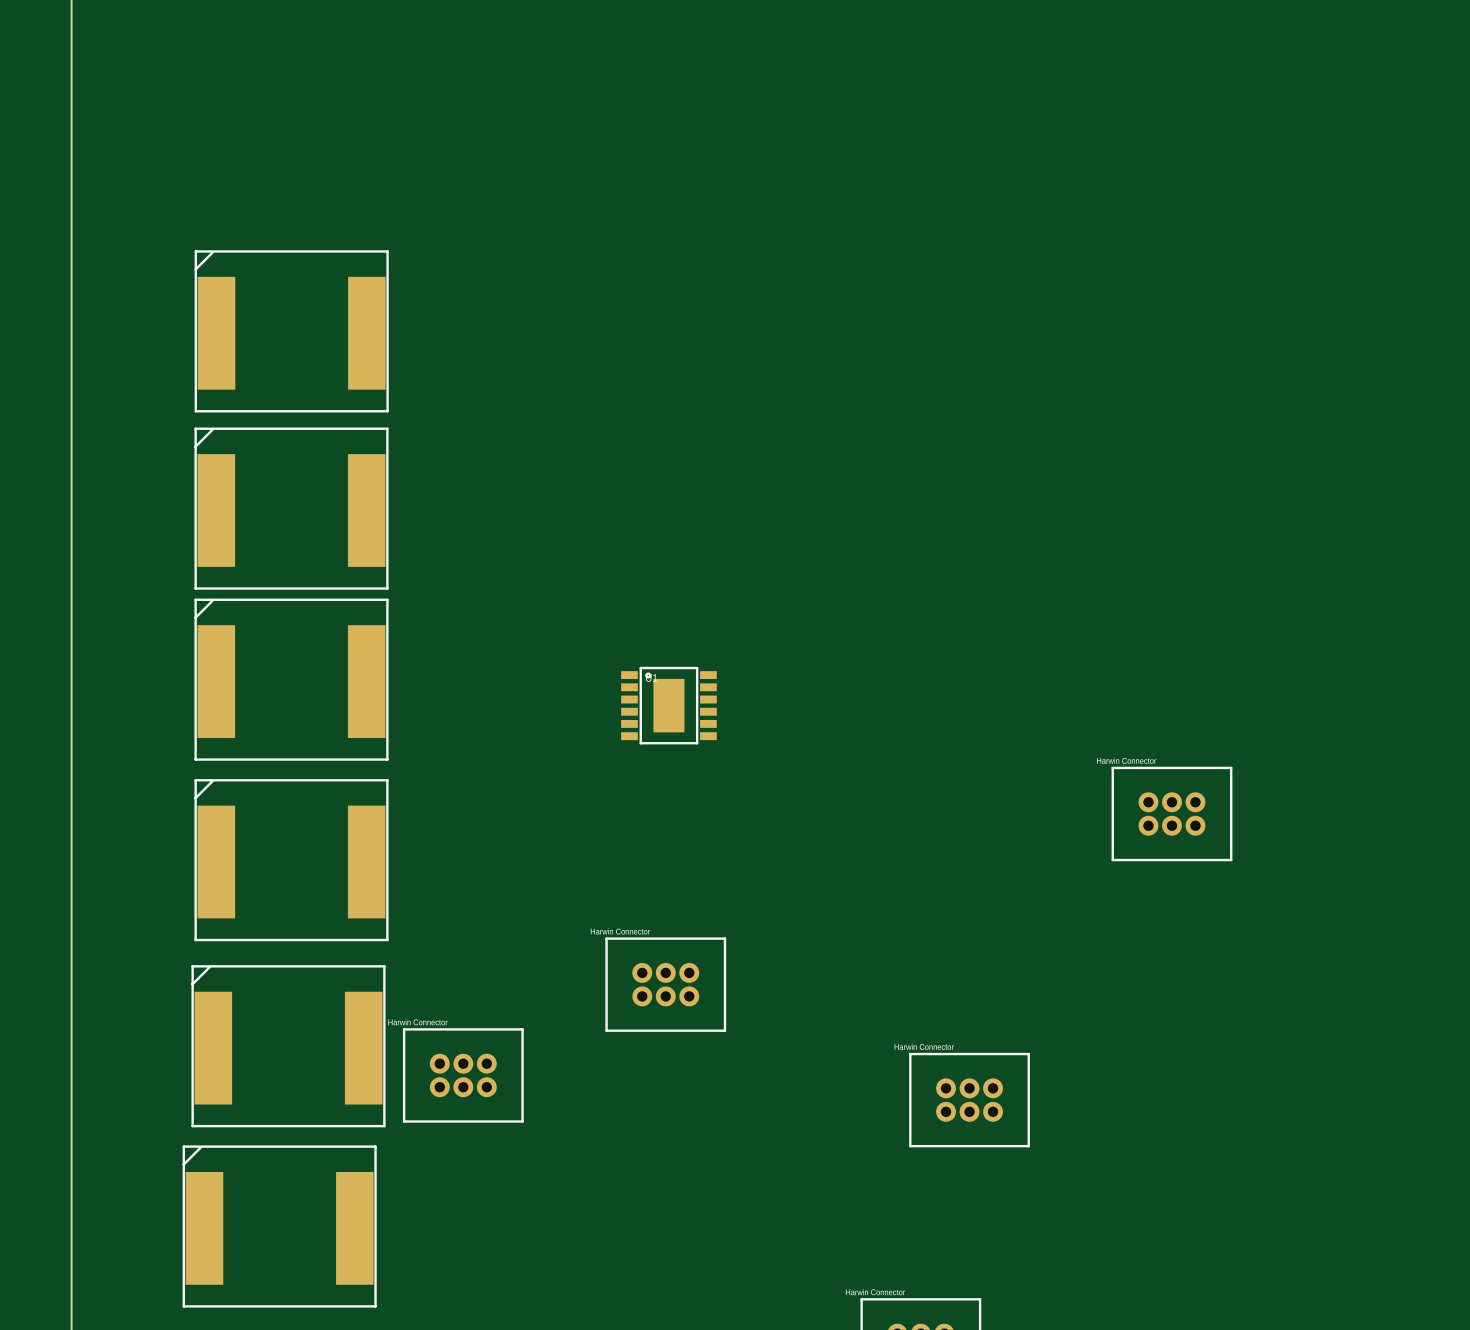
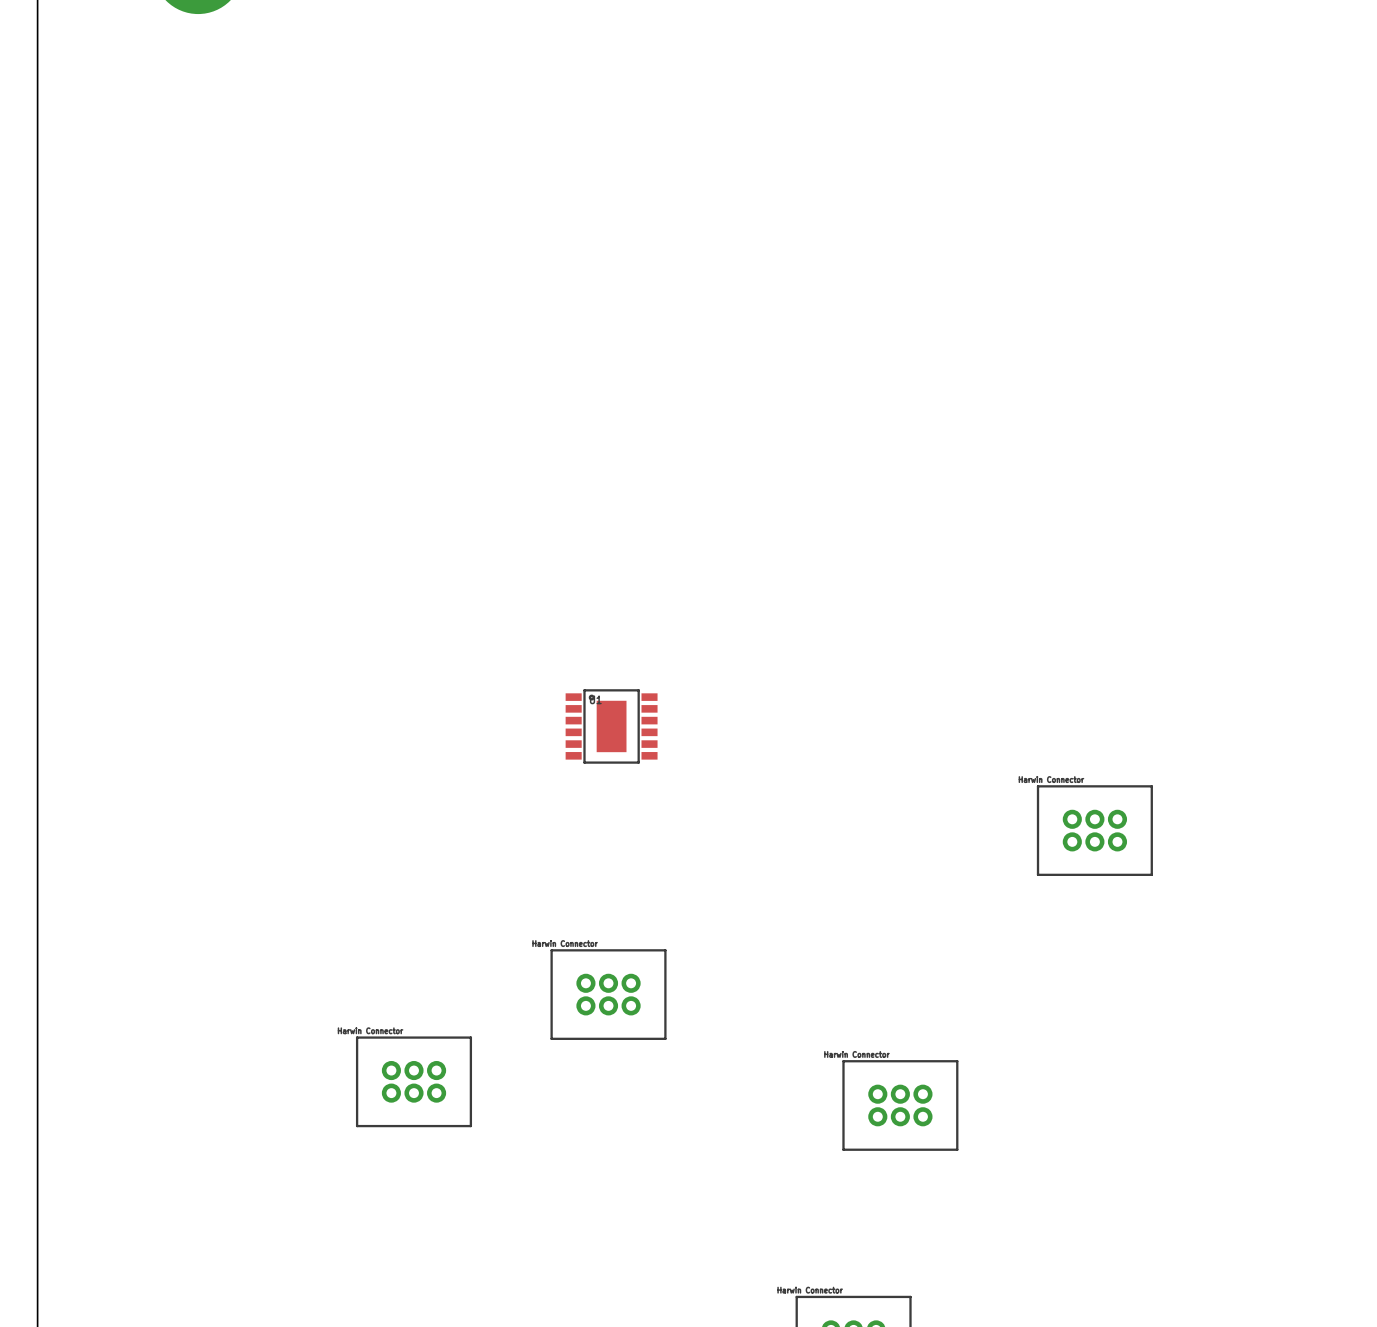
part: (291, 331) -> none
part: (291, 508) -> none
part: (291, 679) -> none
part: (291, 860) -> none
part: (288, 1046) -> none
part: (279, 1226) -> none

